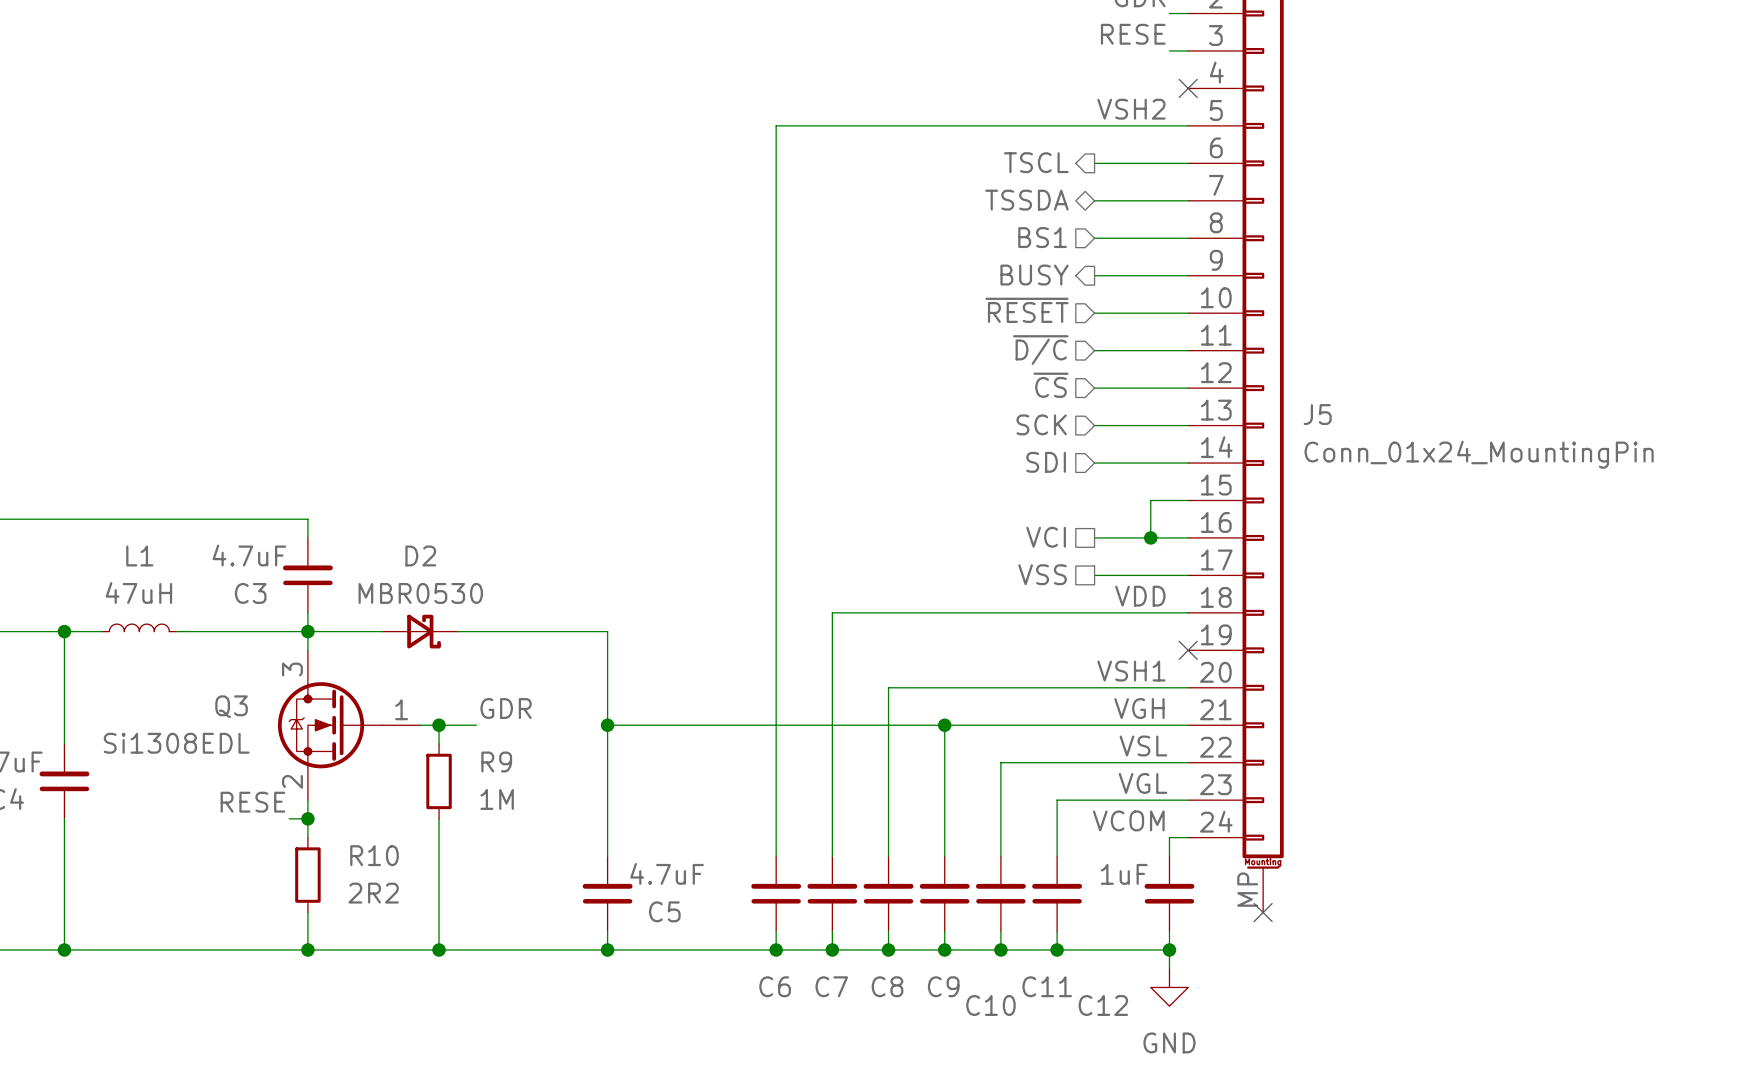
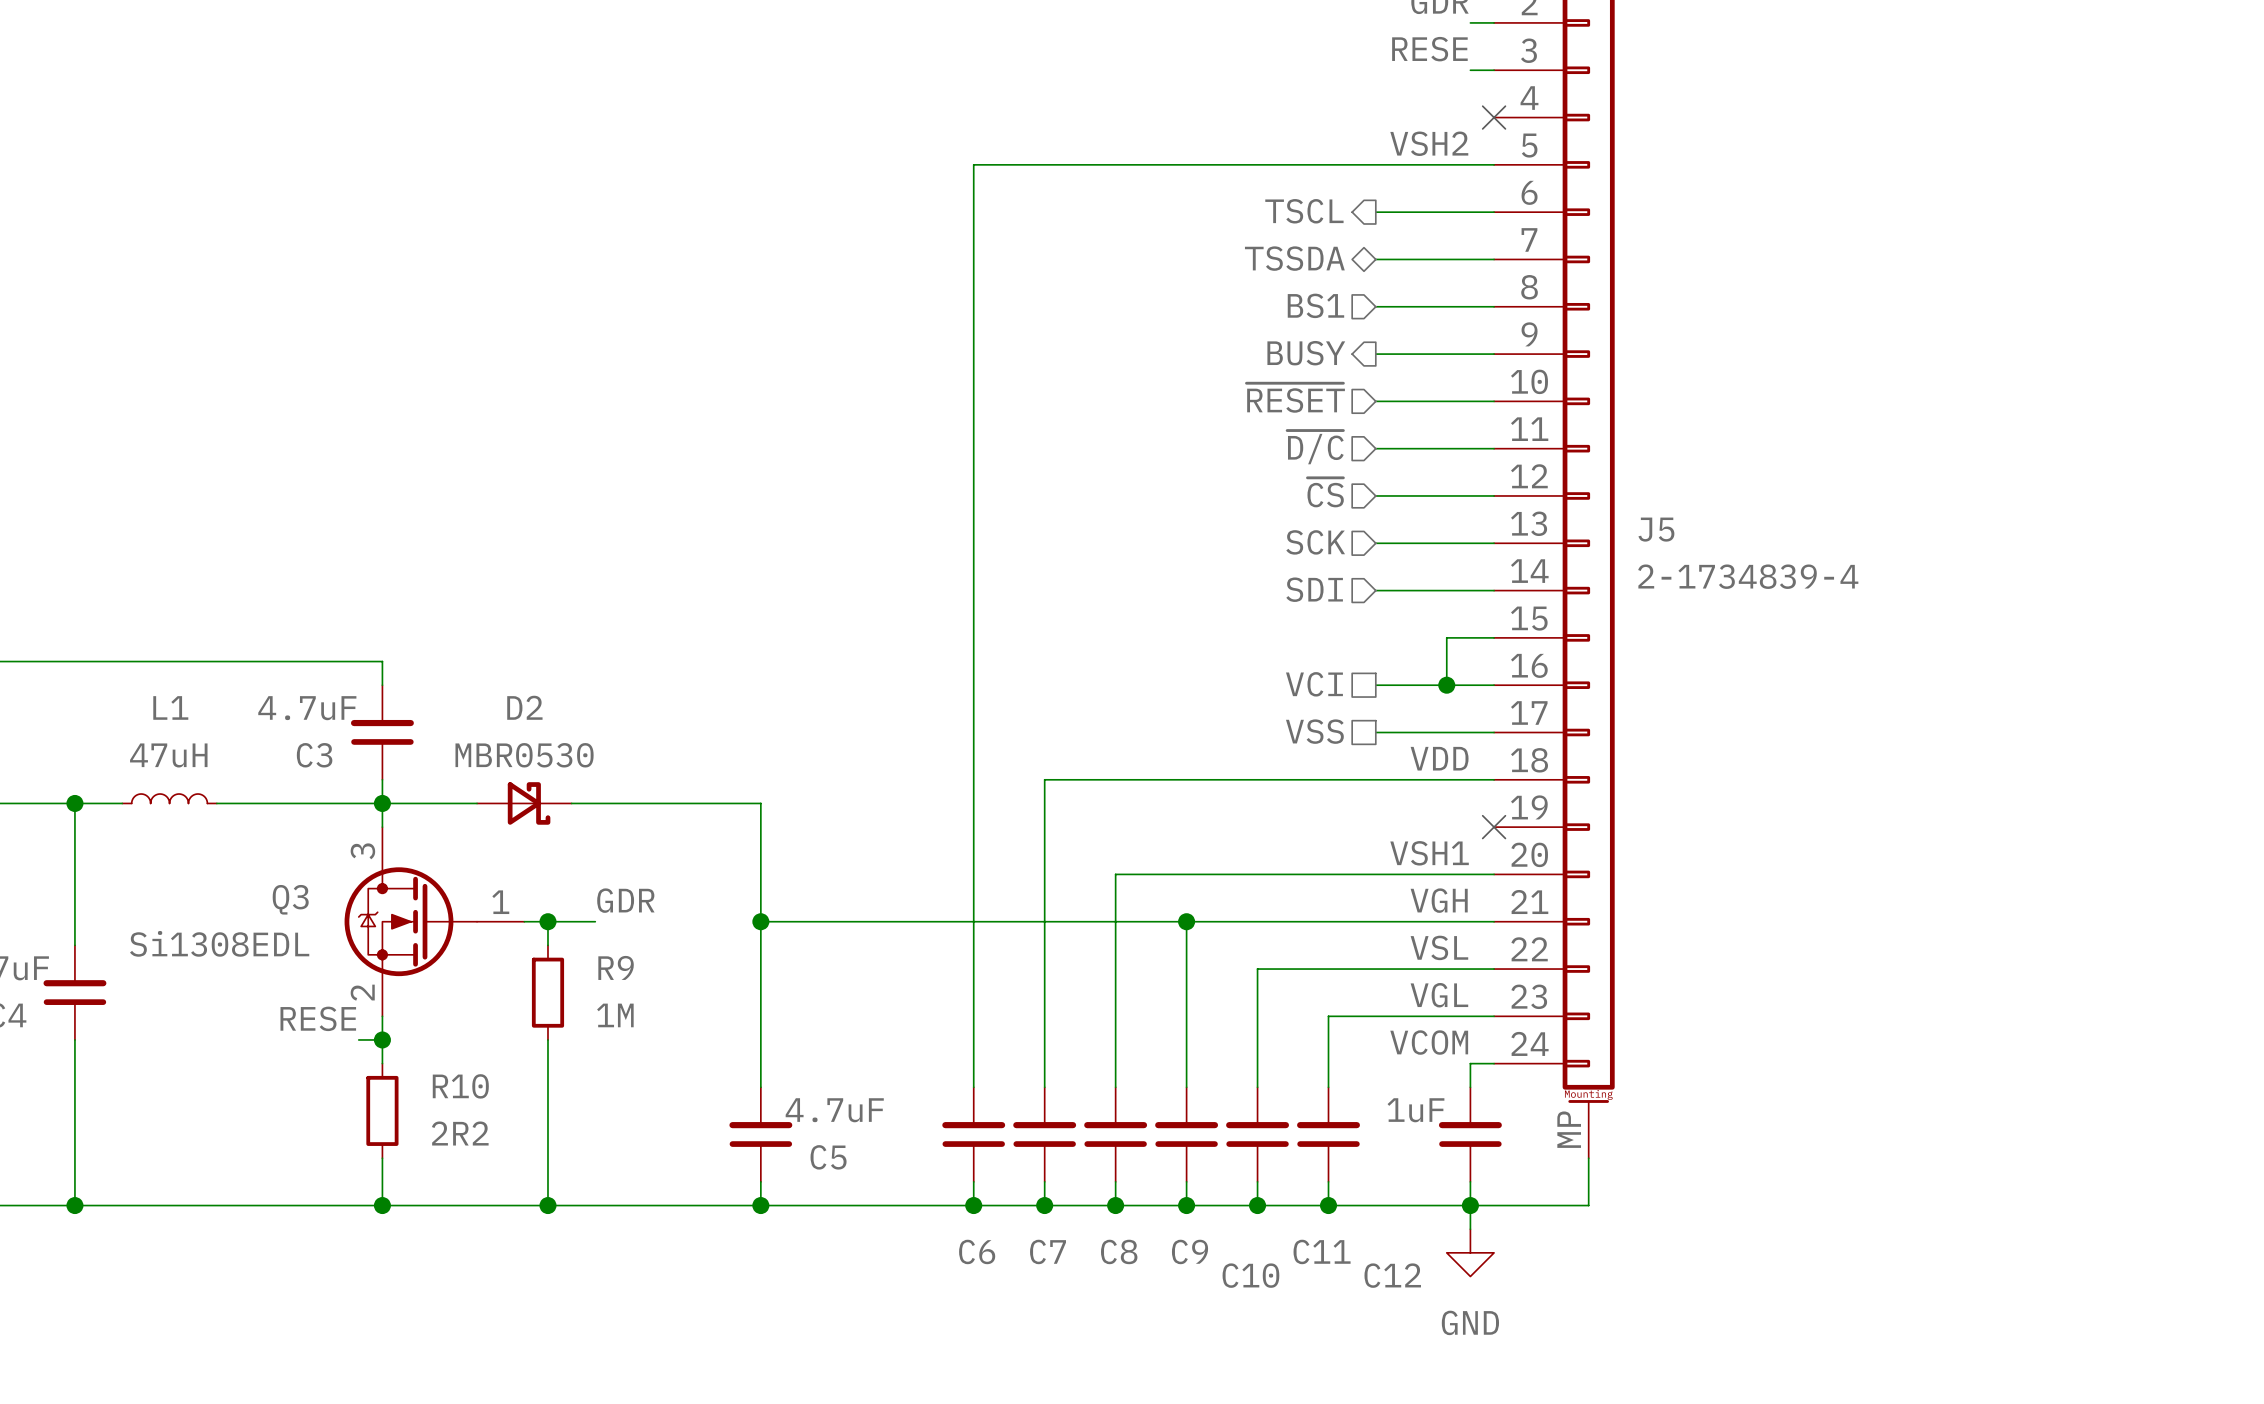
J5 value: Conn_01x24_MountingPin (1479, 454) -> 2-1734839-4 (1748, 576)
wire: none -> (1588, 1158) (1588, 1205) (1470, 1205)
no-connect mark: (1263, 912) -> none

